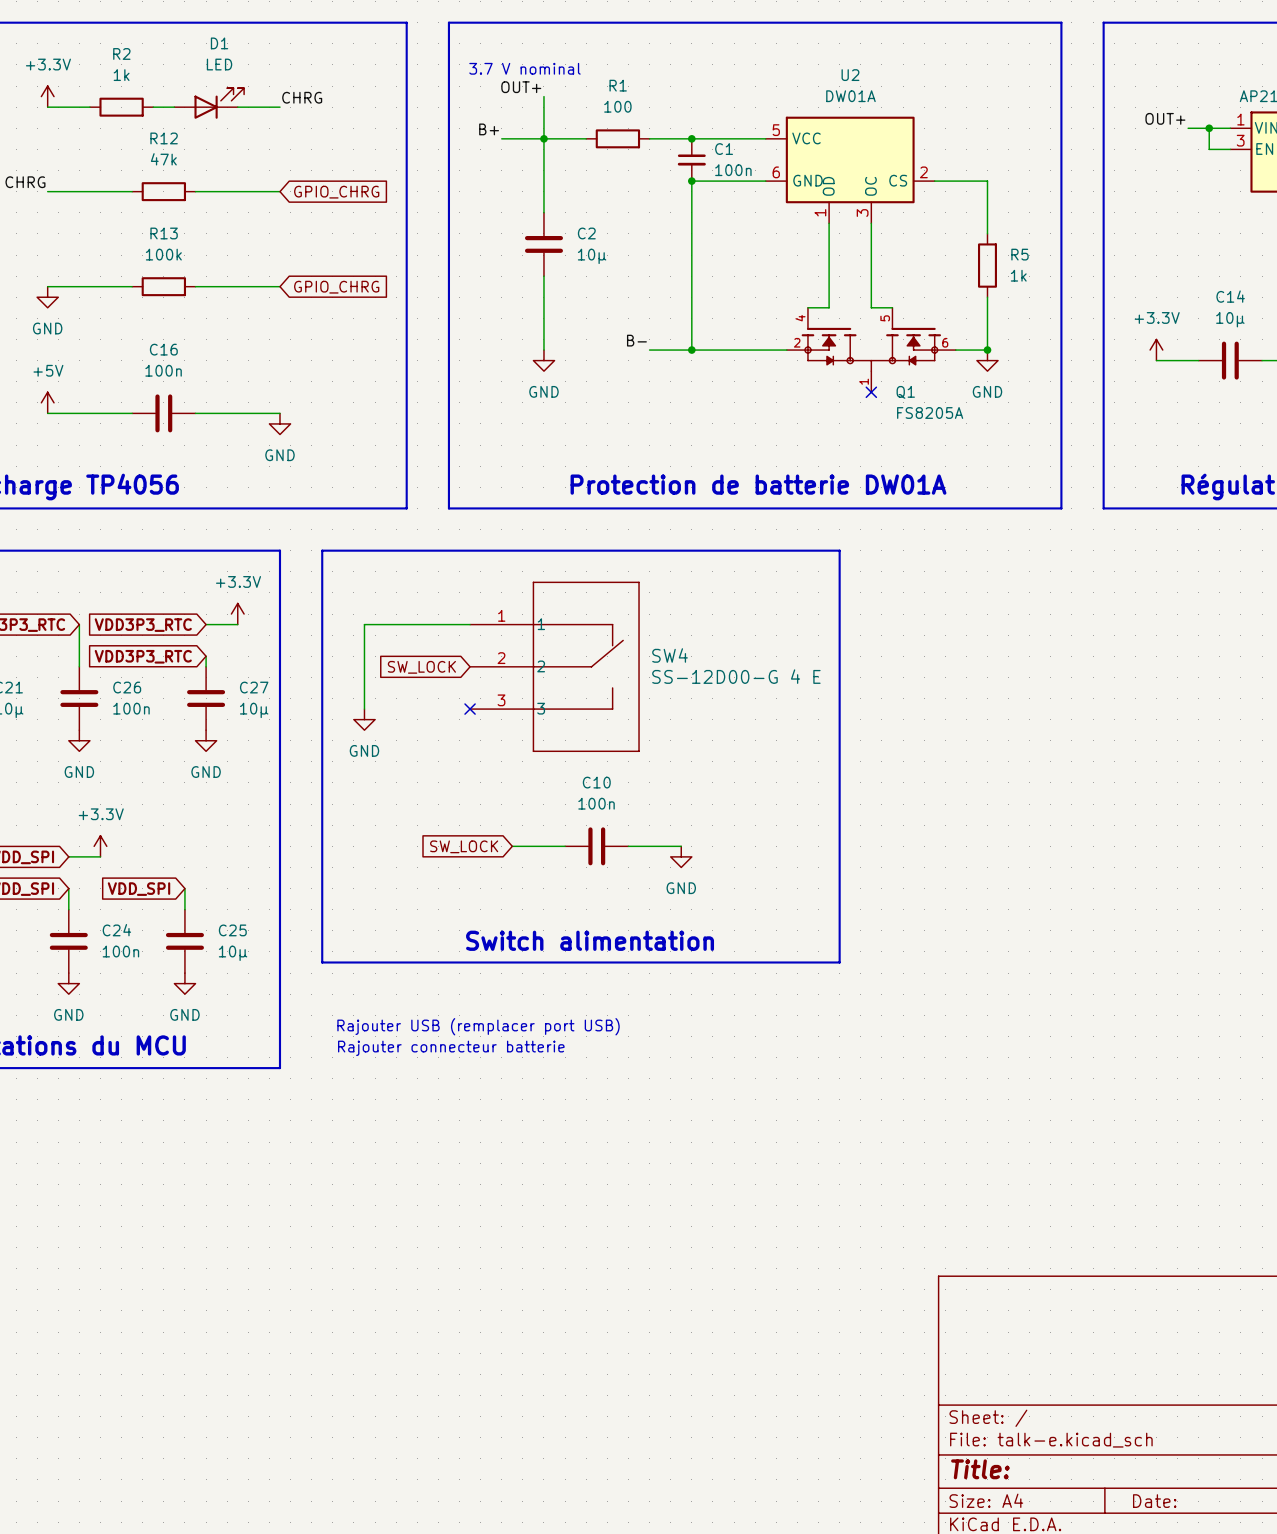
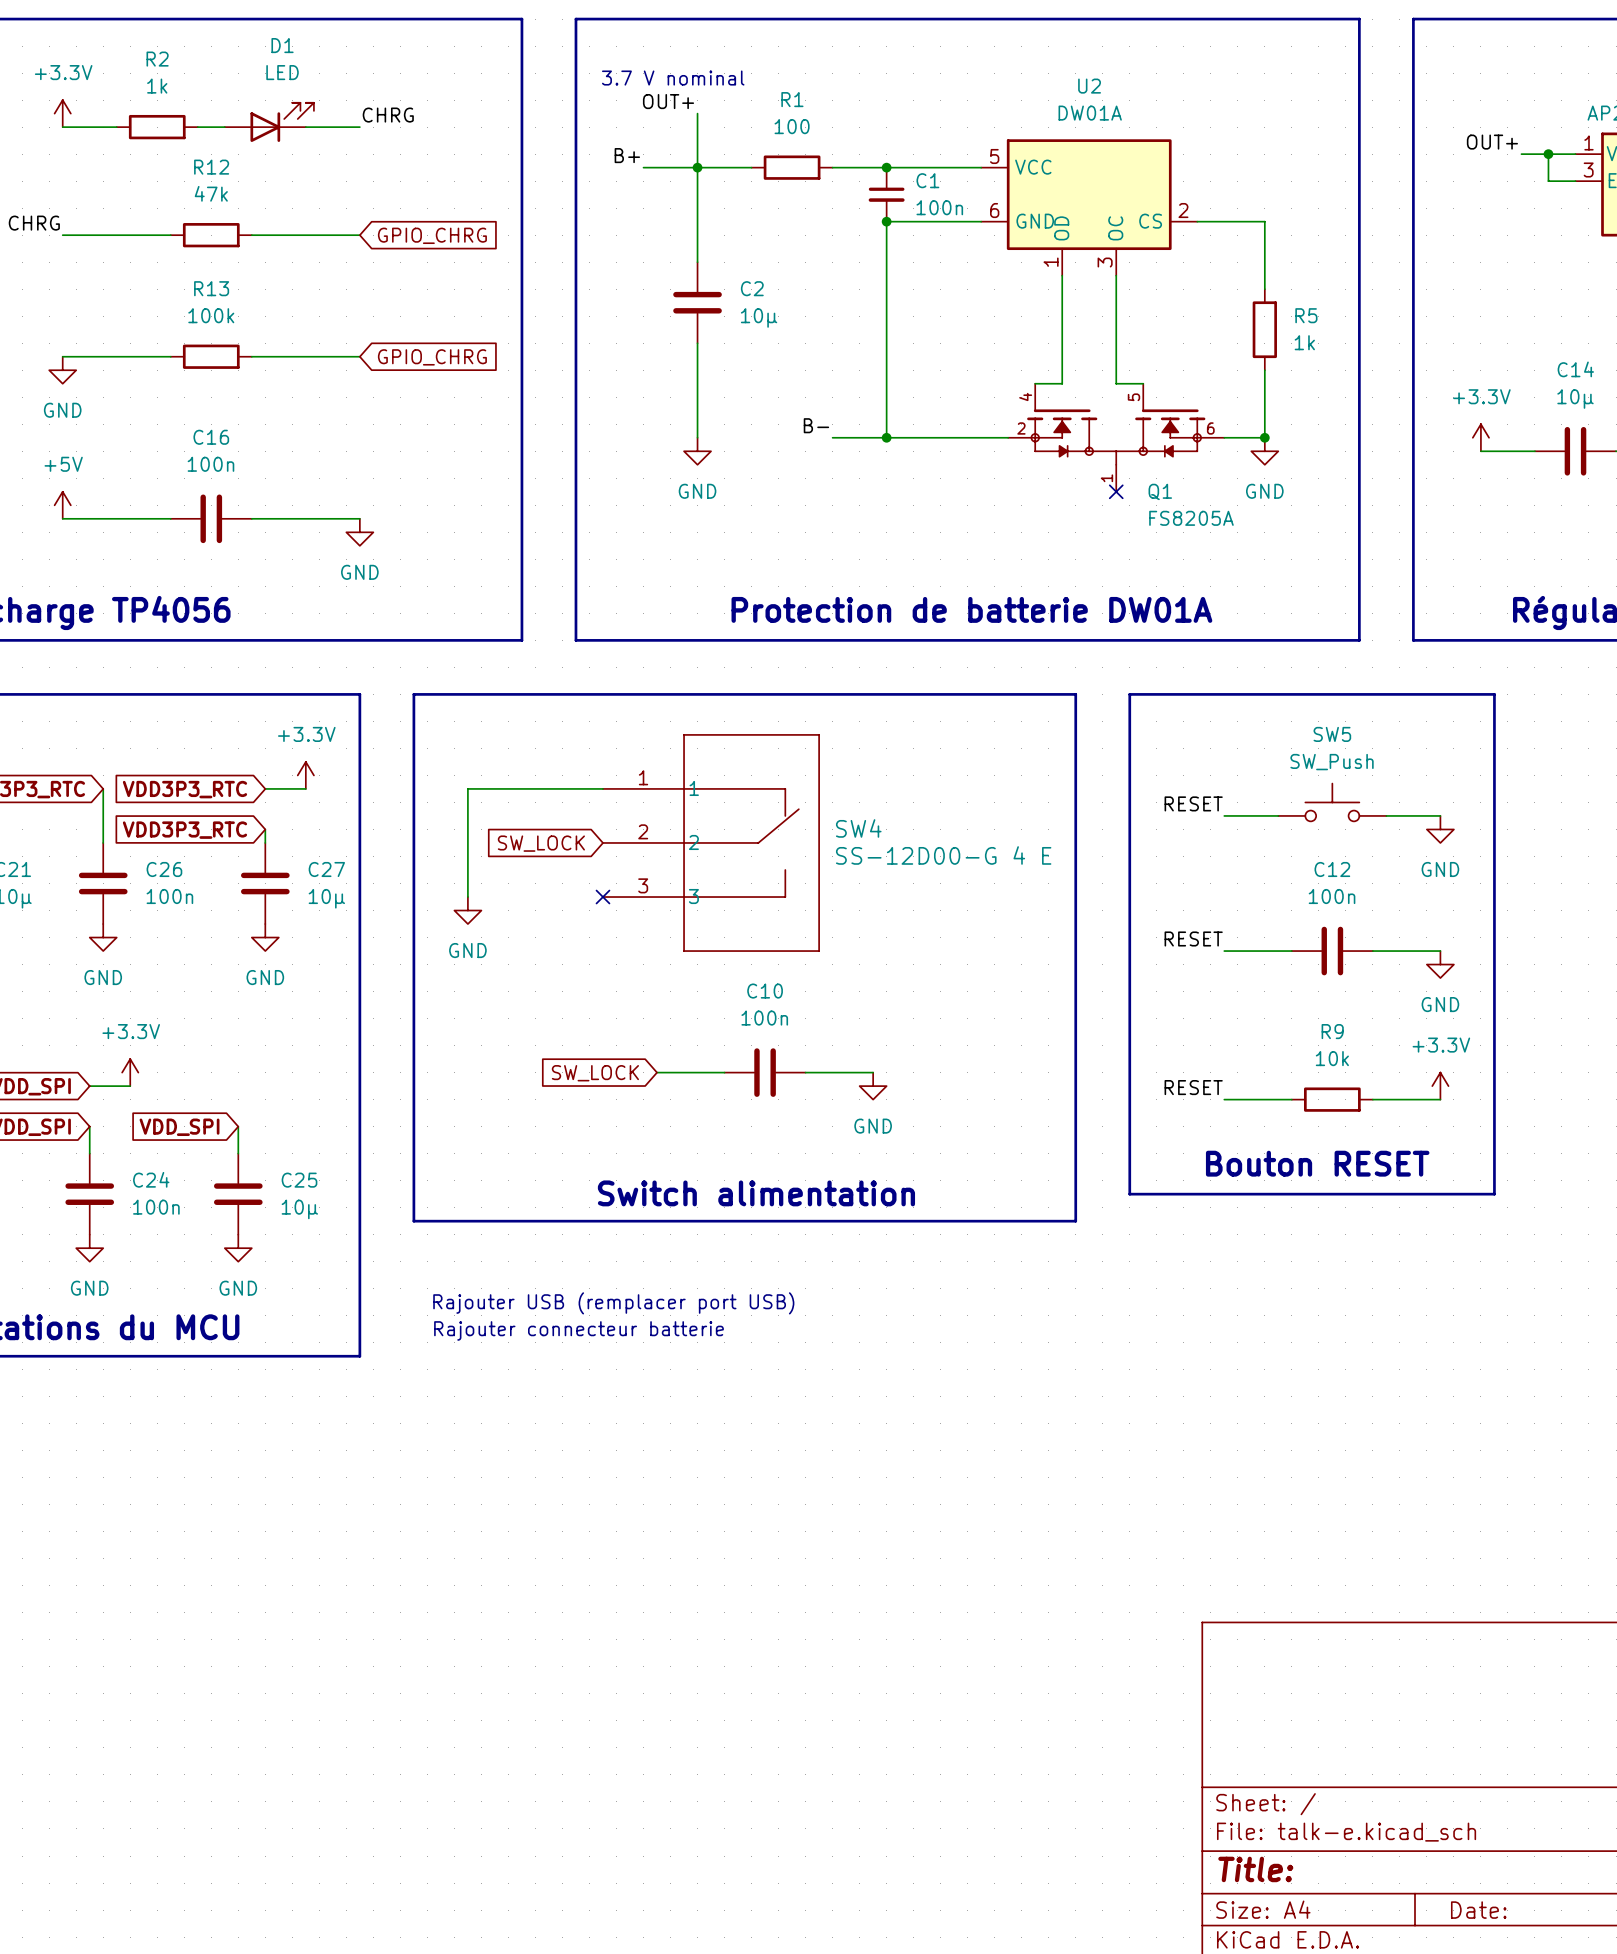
line: none -> (1129, 694) (1494, 694) (1494, 1194) (1129, 1194) (1129, 694)
SW5: none -> SW_Push (1332, 802)
label: none -> RESET (1193, 803)
wire: none -> (1224, 815) (1278, 815)
wire: none -> (1386, 815) (1440, 815)
power symbol: none -> GND (1440, 829)
label: none -> RESET (1193, 938)
wire: none -> (1224, 951) (1291, 951)
C12: none -> 100n (1332, 951)
wire: none -> (1372, 951) (1440, 951)
power symbol: none -> GND (1440, 964)
power symbol: none -> +3.3V (1440, 1086)
label: none -> RESET (1193, 1087)
wire: none -> (1224, 1099) (1291, 1099)
R9: none -> 10k (1332, 1099)
wire: none -> (1372, 1099) (1440, 1099)
text: none -> Bouton RESET (1317, 1163)

